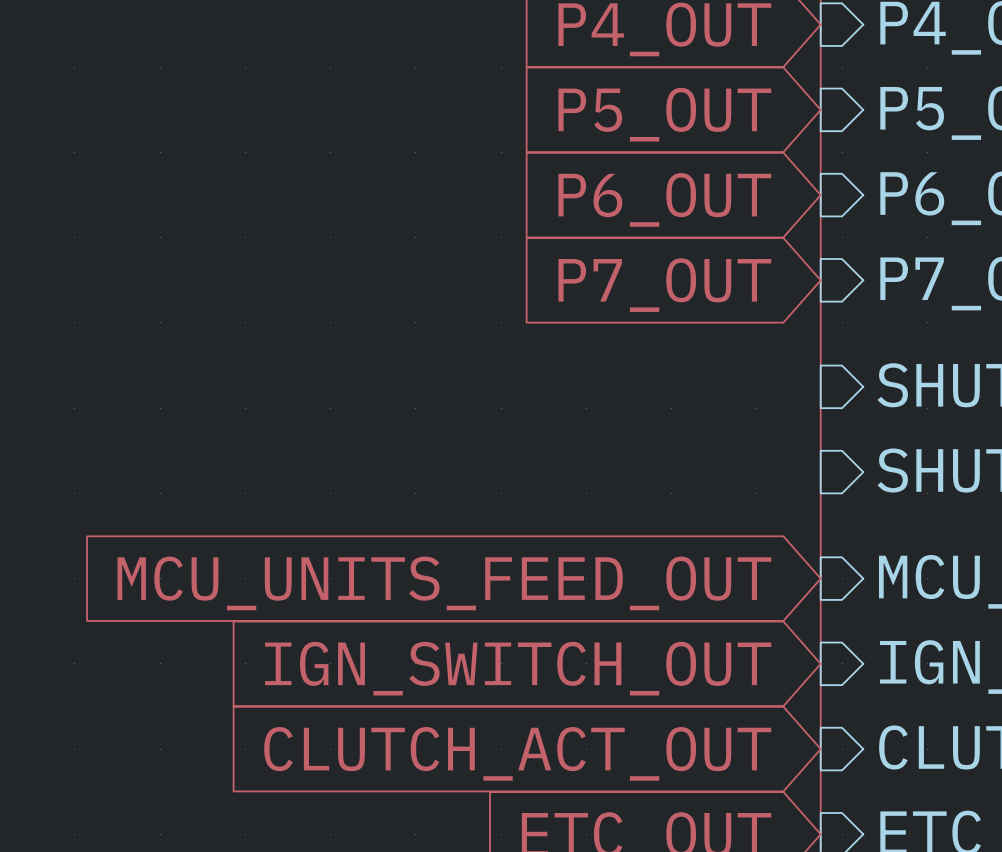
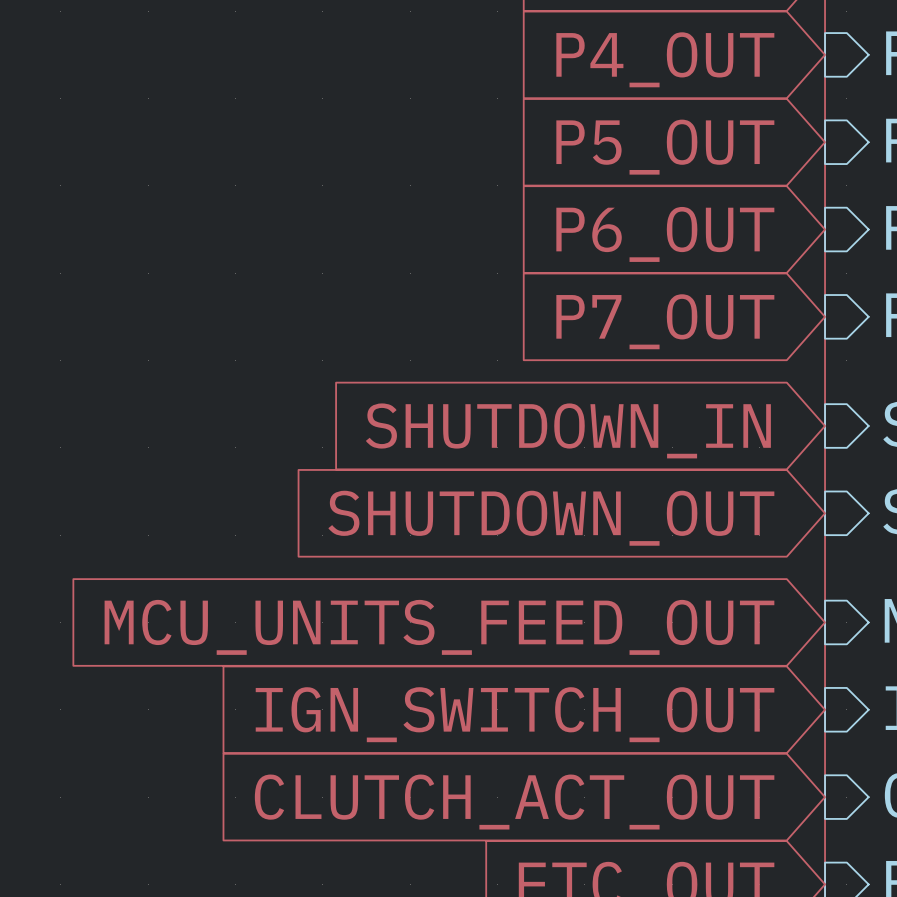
global label: none -> SHUTDOWN_IN (568, 430)
global label: none -> SHUTDOWN_OUT (551, 518)

